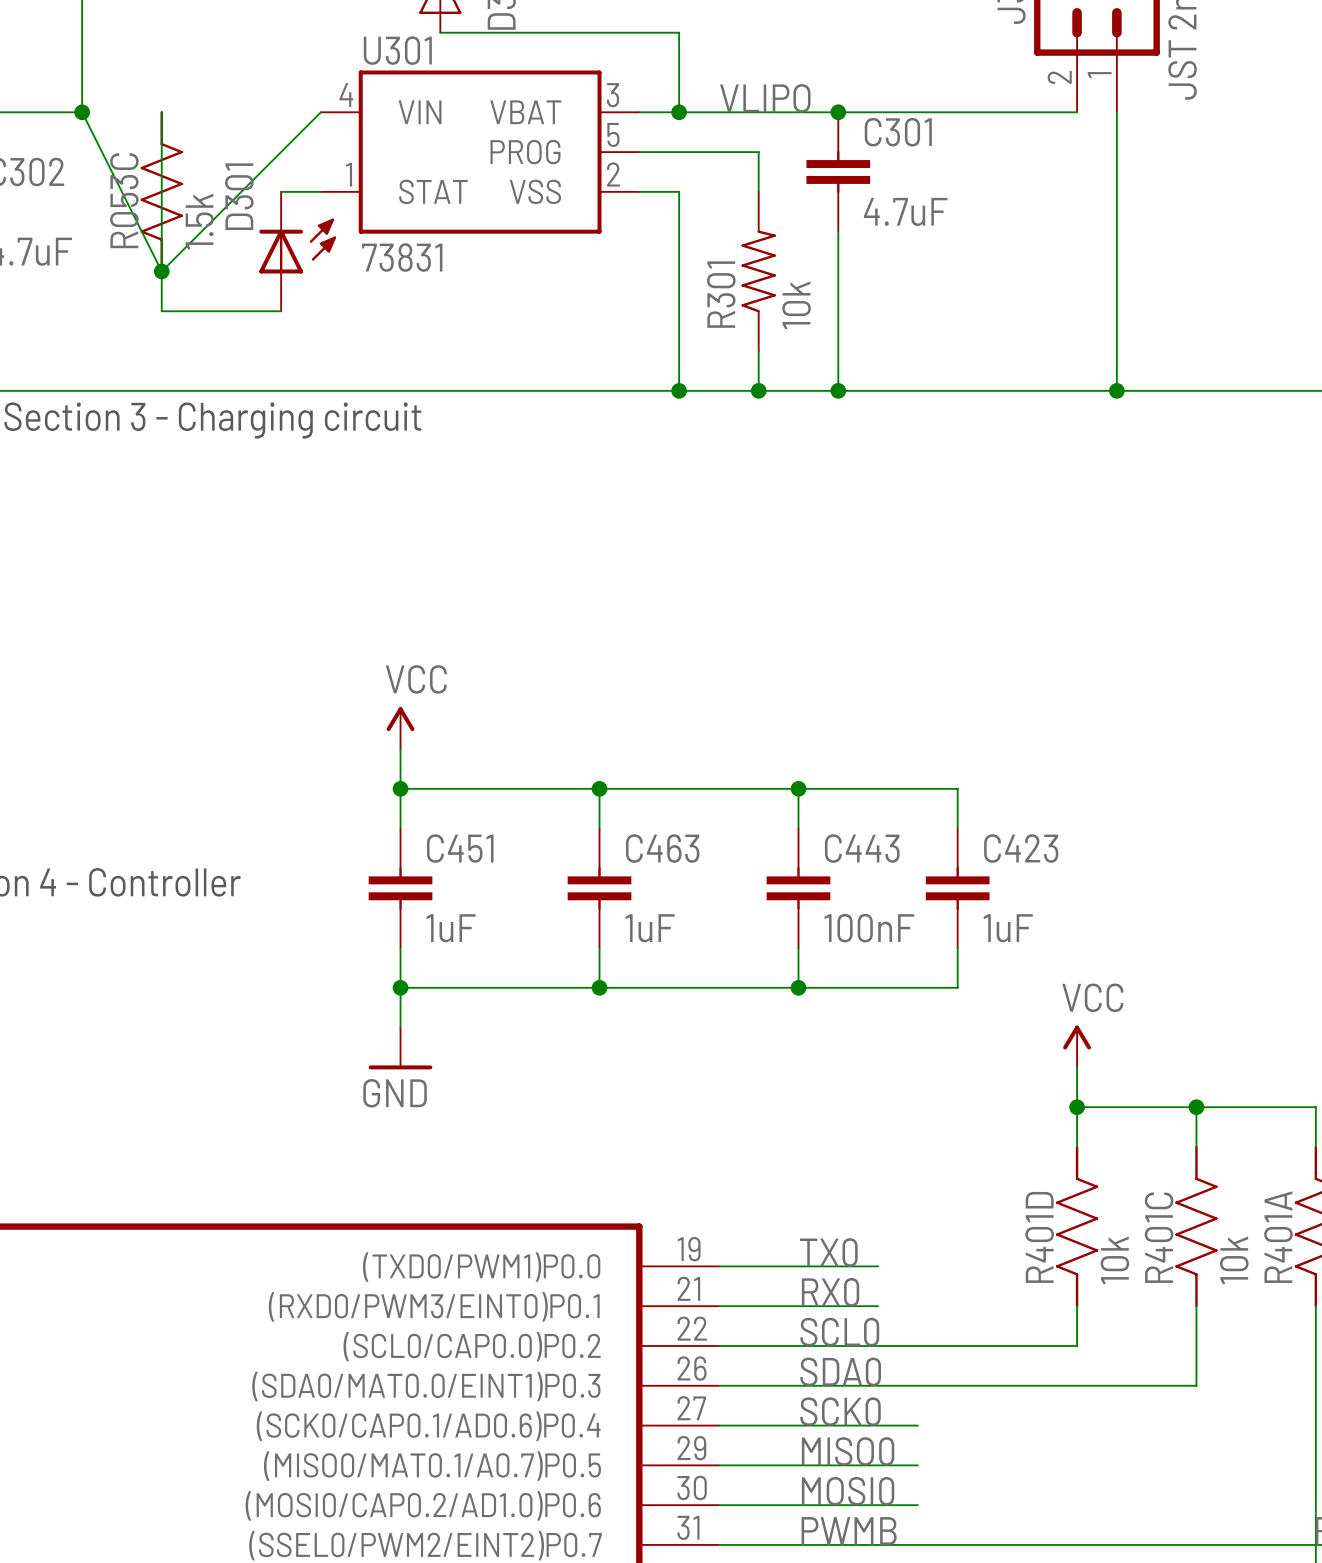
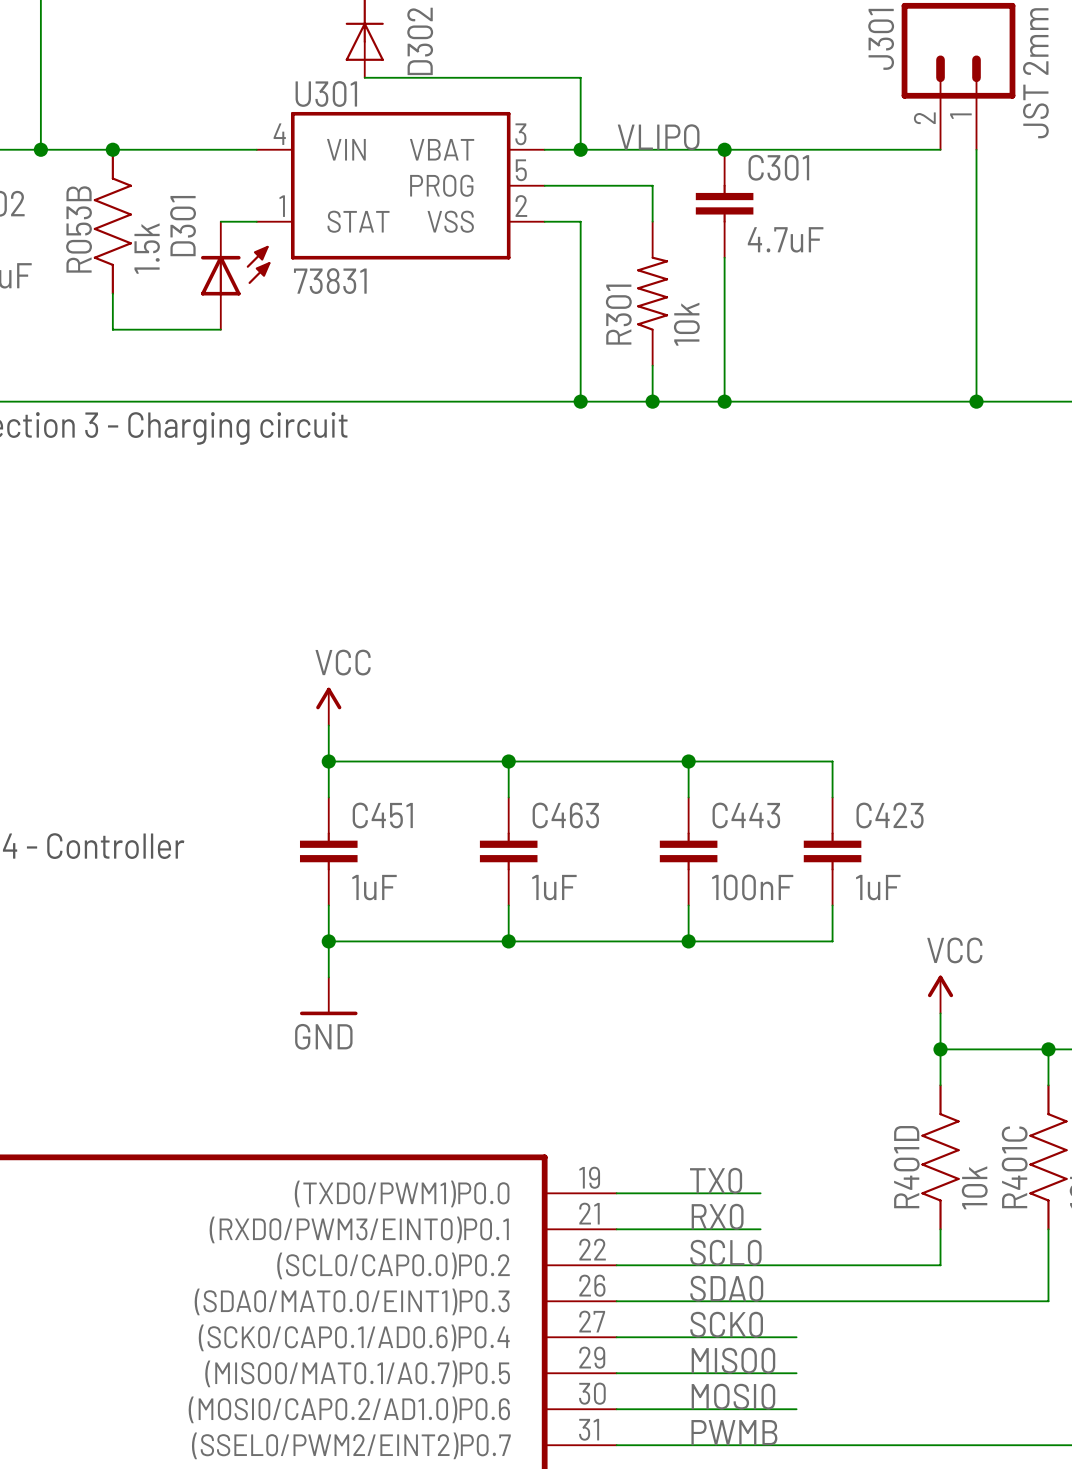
wire: (82, 112) (161, 271) -> none
wire: (161, 112) (161, 271) -> none
junction: none -> (112, 149)
wire: (320, 112) (161, 271) -> (256, 149) (40, 149)
R053C name: R053C (124, 200) -> R053B (79, 229)
junction: (161, 271) -> none

